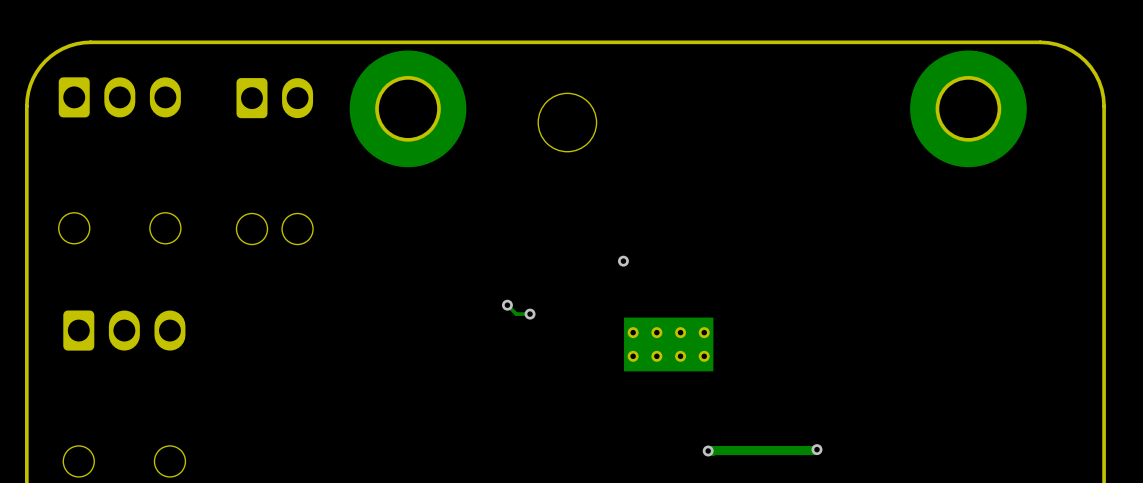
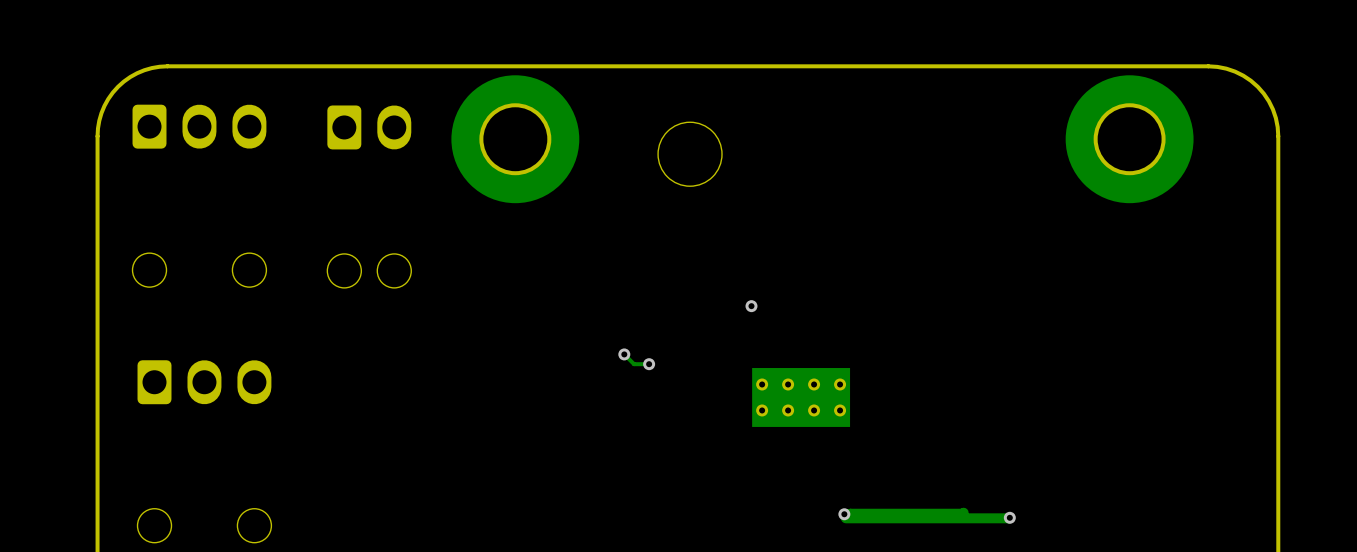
via position: (817, 449) -> (1009, 517)
track: none -> (1009, 517) (845, 518)

